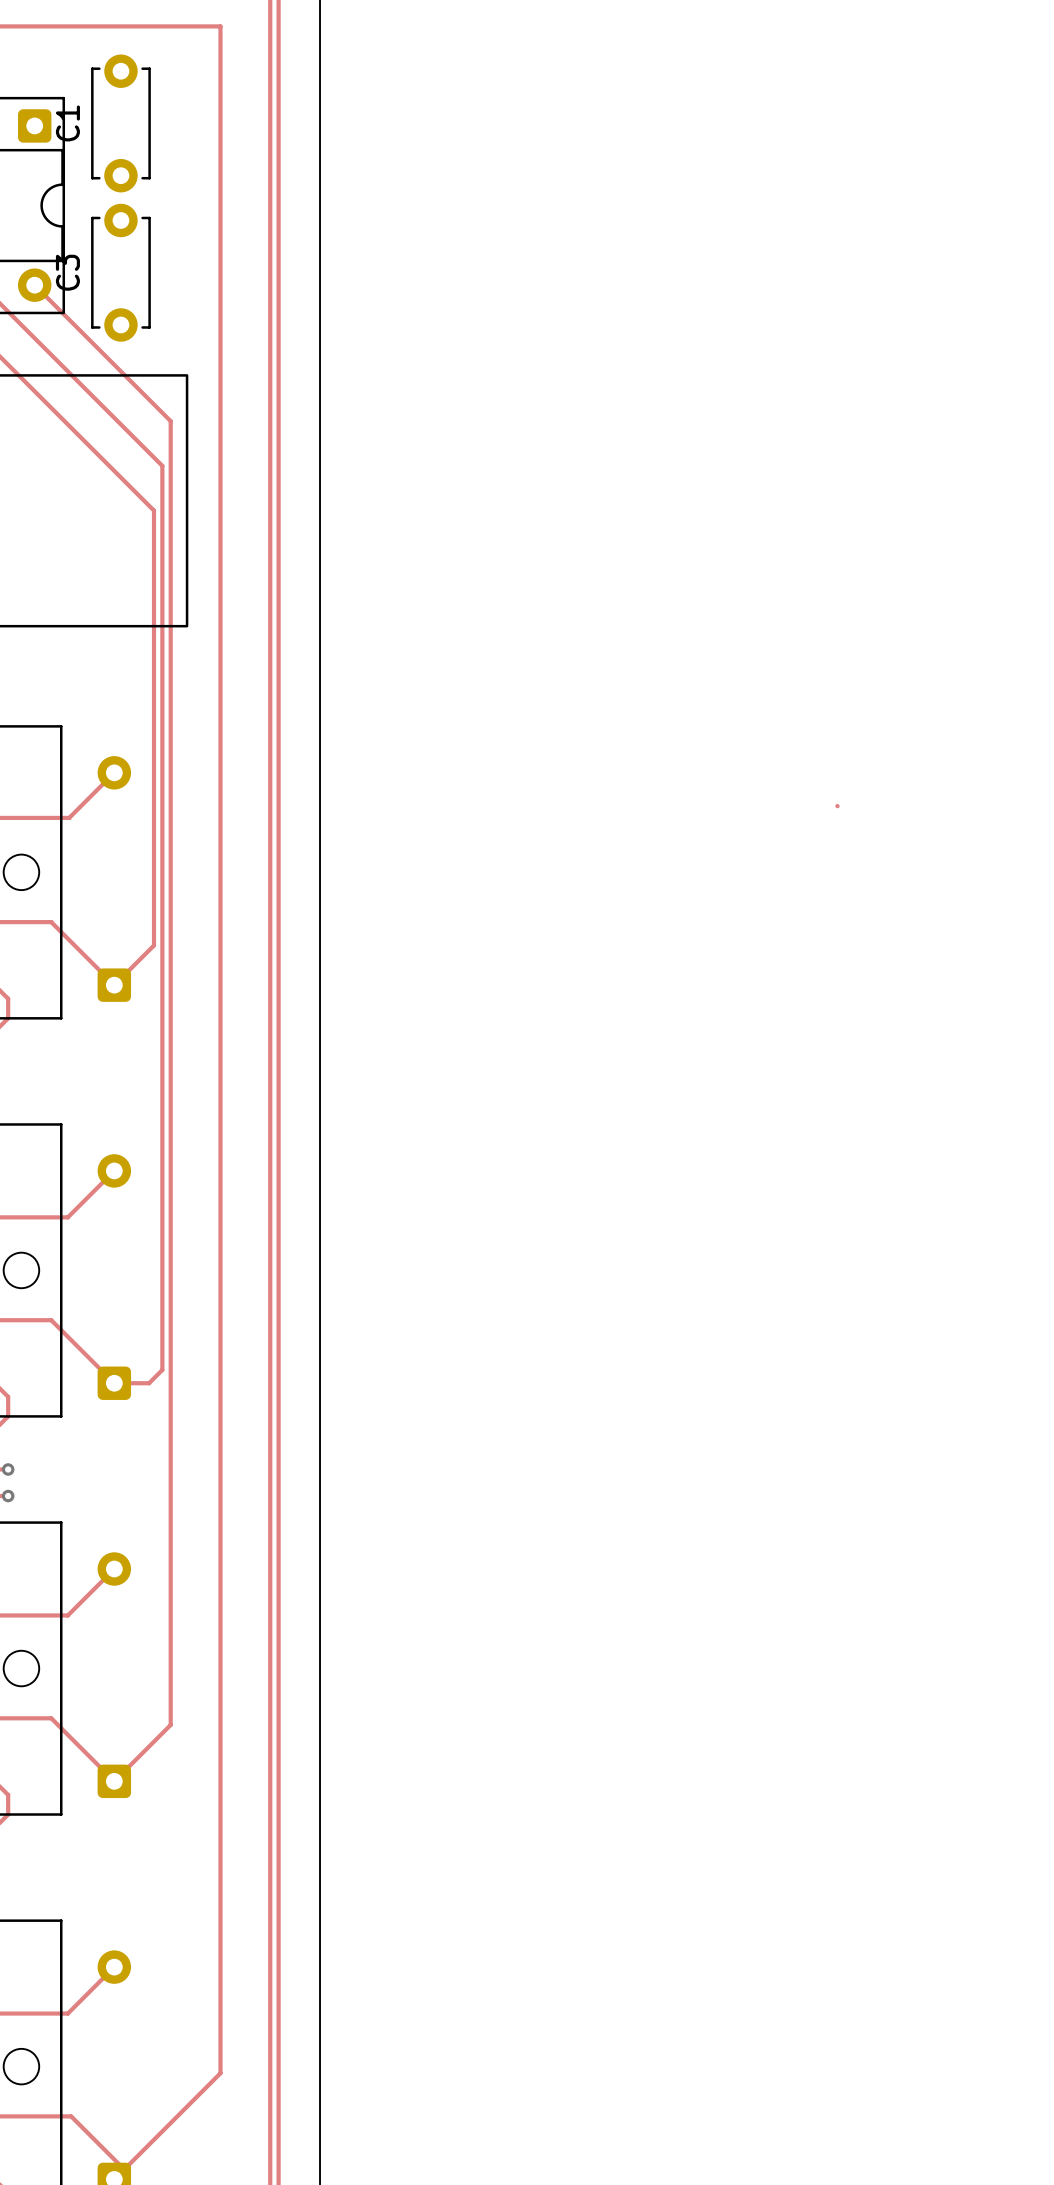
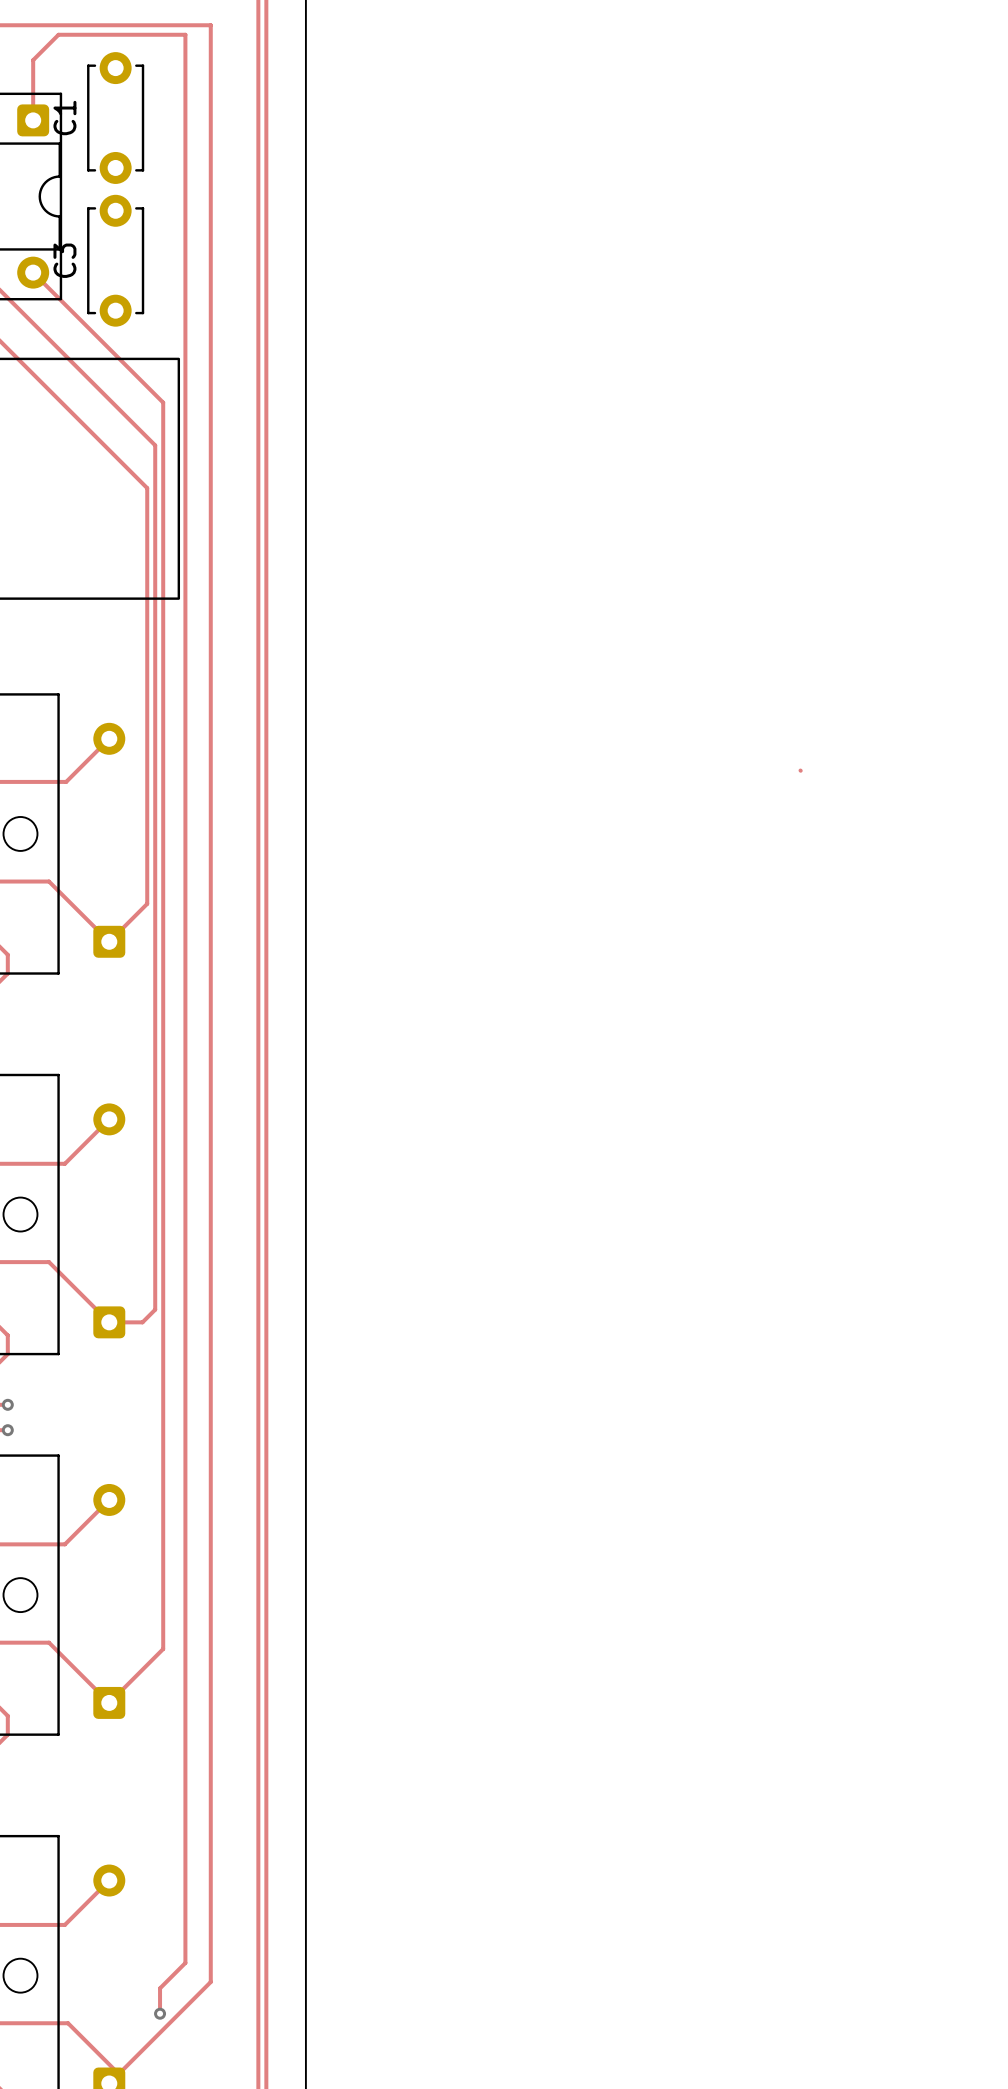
track: none -> (33, 120) (33, 60) (58, 34) (185, 34) (185, 1962) (160, 1988) (160, 2013)
via: none -> (160, 2013)

